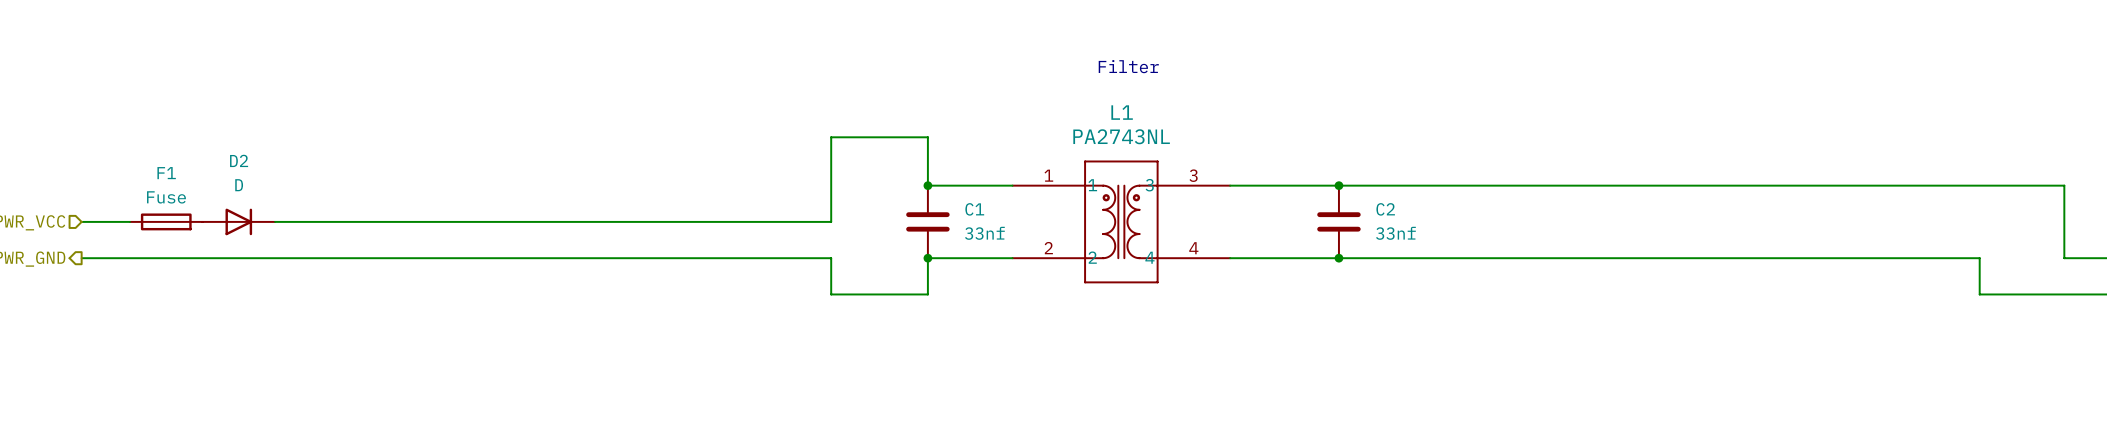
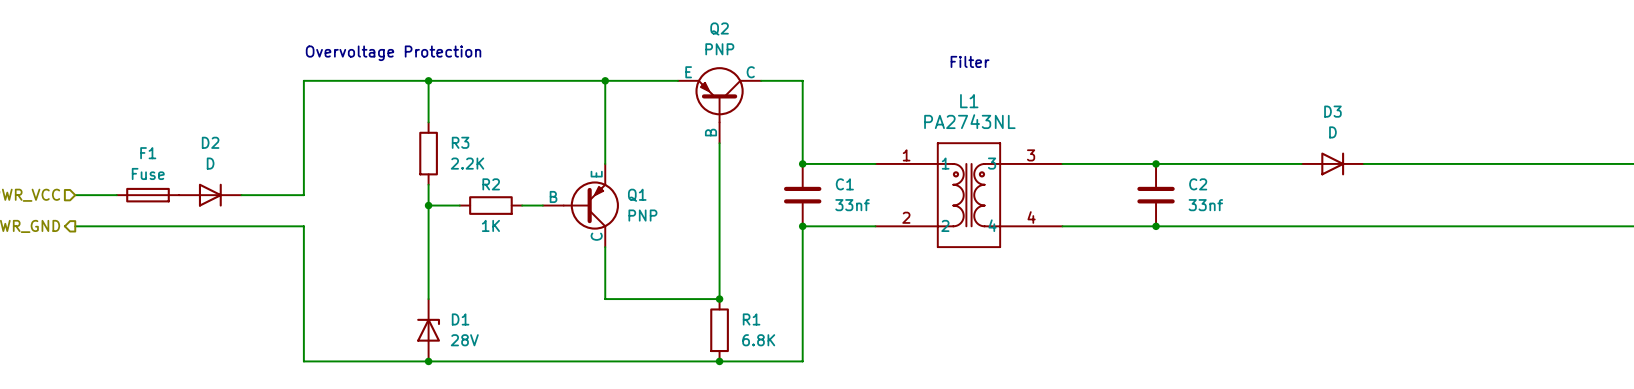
text: none -> Overvoltage Protection (393, 53)
wire: none -> (428, 80) (428, 122)
junction: none -> (428, 80)
wire: none -> (605, 80) (605, 163)
junction: none -> (605, 80)
Q2: none -> PNP (719, 105)
wire: (927, 137) (831, 137) (831, 161) -> (802, 122) (802, 80) (761, 80)
R3: none -> 2.2K (428, 153)
D3: none -> D (1332, 163)
wire: none -> (428, 184) (428, 299)
wire: (347, 221) (831, 221) -> (303, 195) (303, 80) (677, 80)
wire: none -> (719, 195) (719, 226)
wire: none -> (428, 205) (459, 205)
junction: none -> (428, 205)
R2: none -> 1K (490, 205)
wire: none -> (522, 205) (542, 205)
Q1: none -> PNP (580, 205)
wire: (347, 258) (831, 258) -> (303, 226) (303, 361) (802, 361) (802, 257)
wire: (831, 294) (927, 294) -> (719, 257) (719, 299) (605, 299) (605, 247)
junction: none -> (719, 299)
D1: none -> 28V (428, 330)
R1: none -> 6.8K (719, 330)
junction: none -> (428, 361)
junction: none -> (719, 361)

